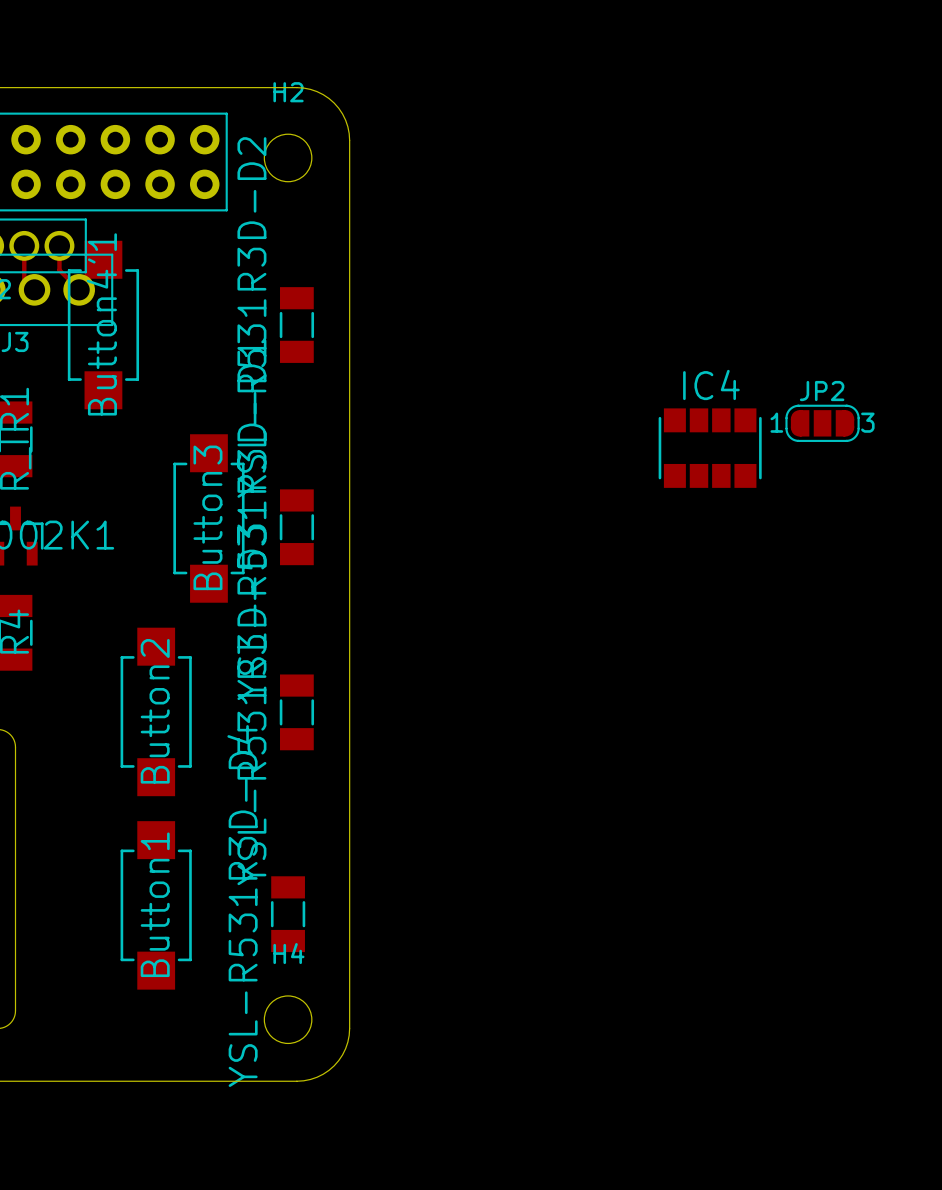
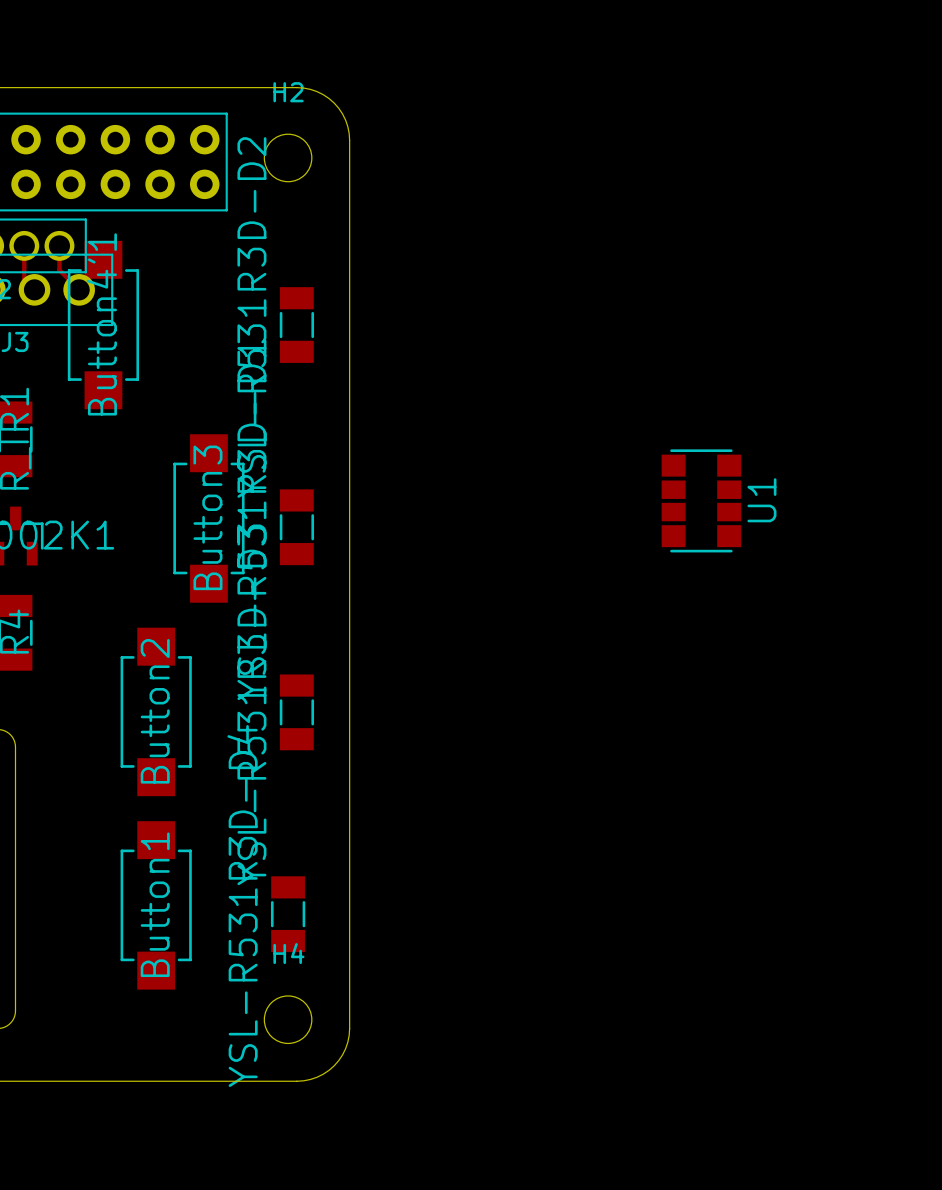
JP2: (822, 423) -> none
IC4: (710, 448) -> none
U1: none -> (701, 500)

